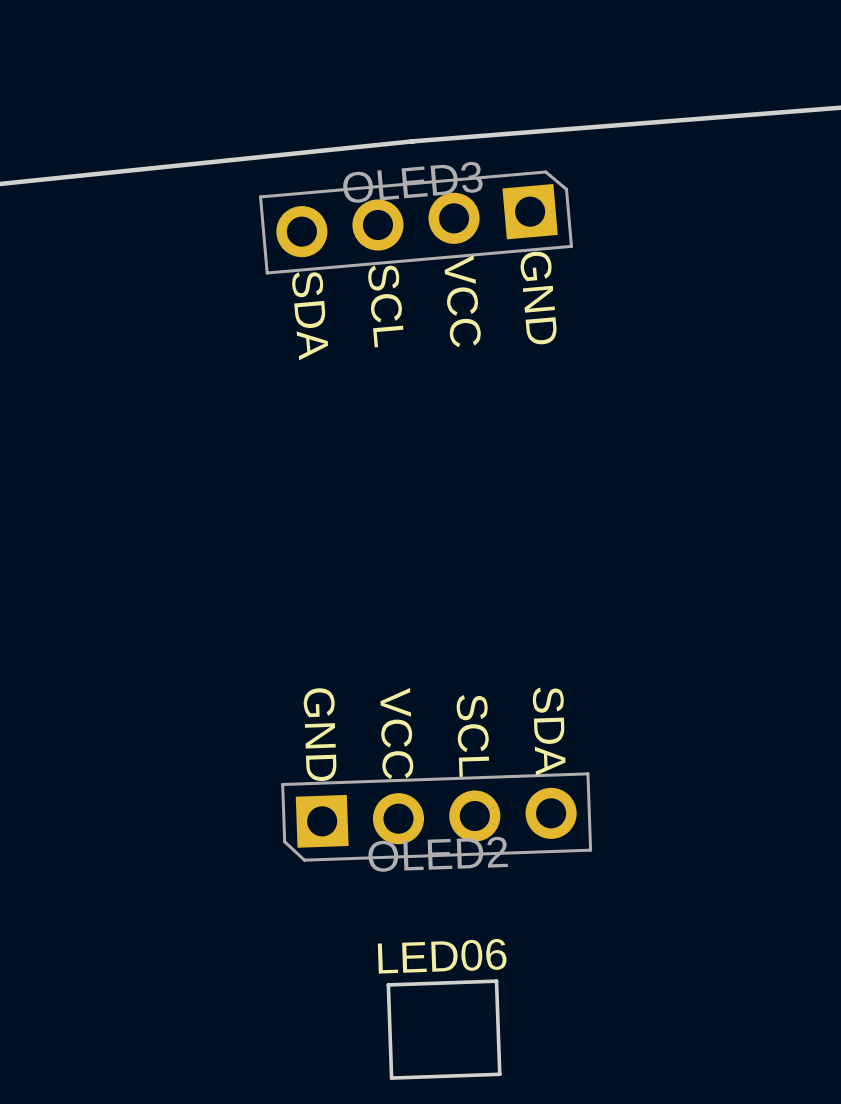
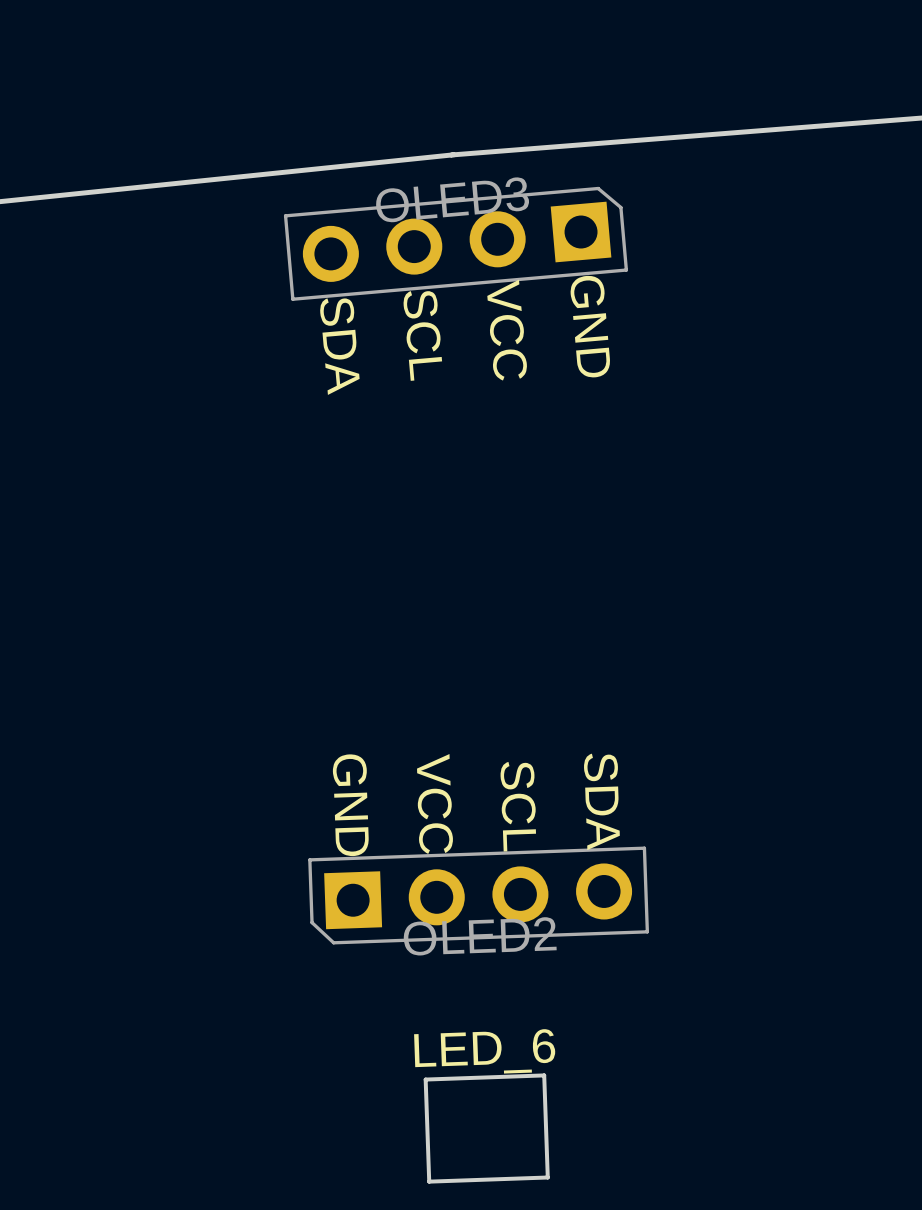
text: LED06 (442, 956) -> LED_6 (484, 1051)

